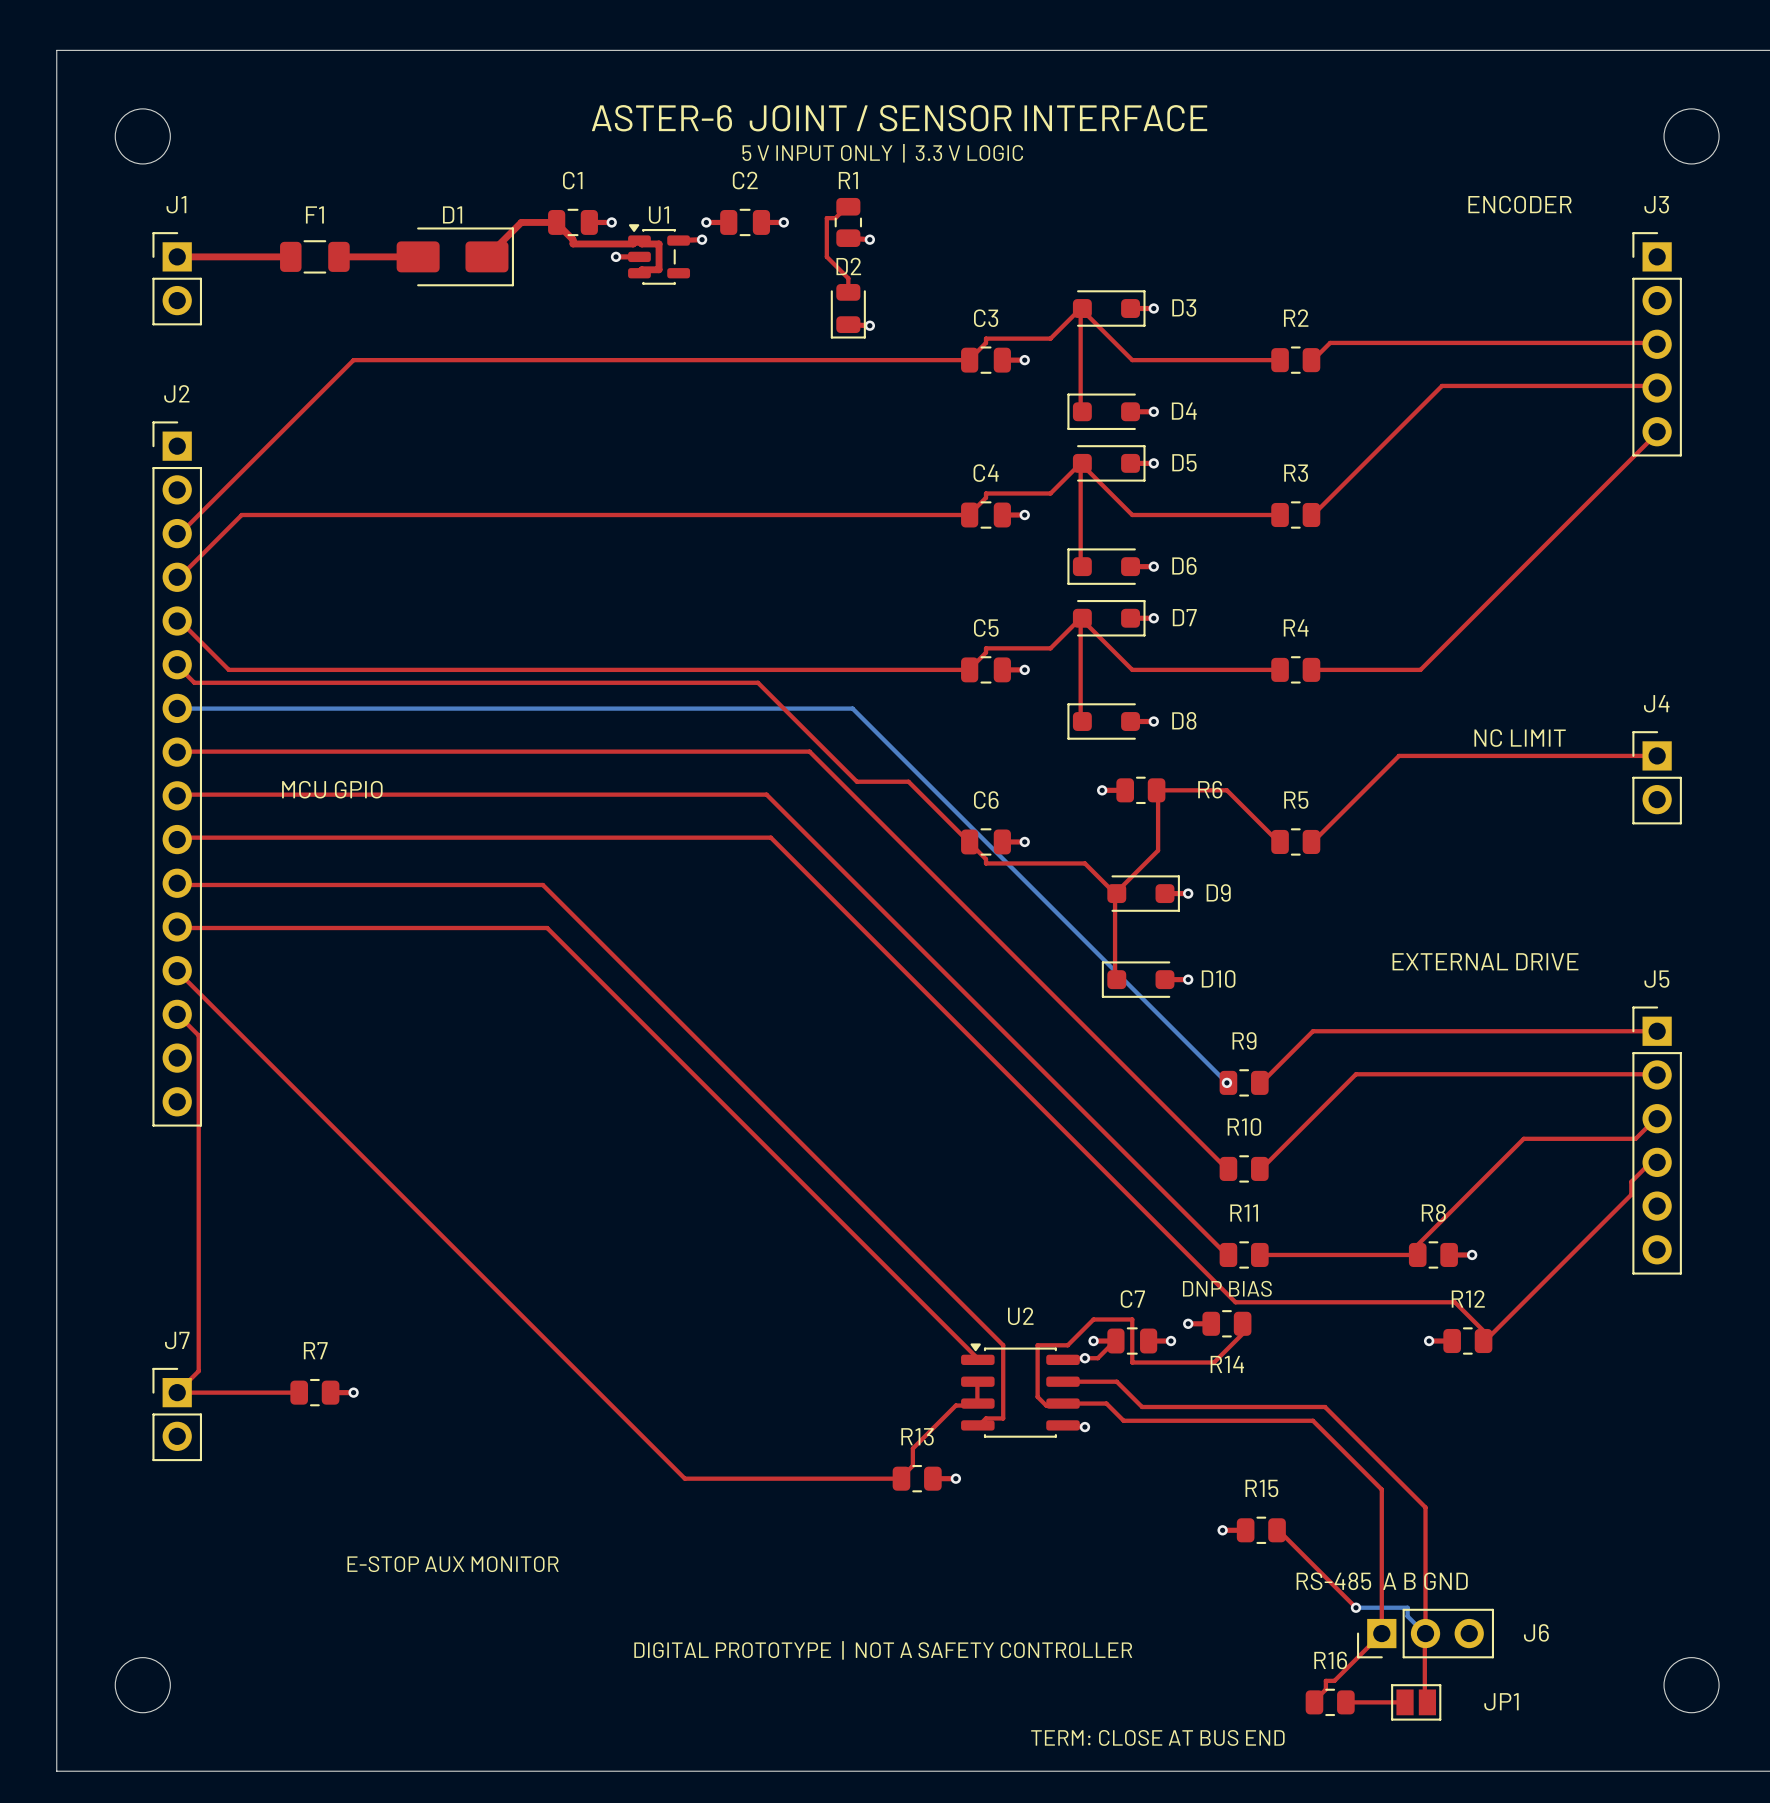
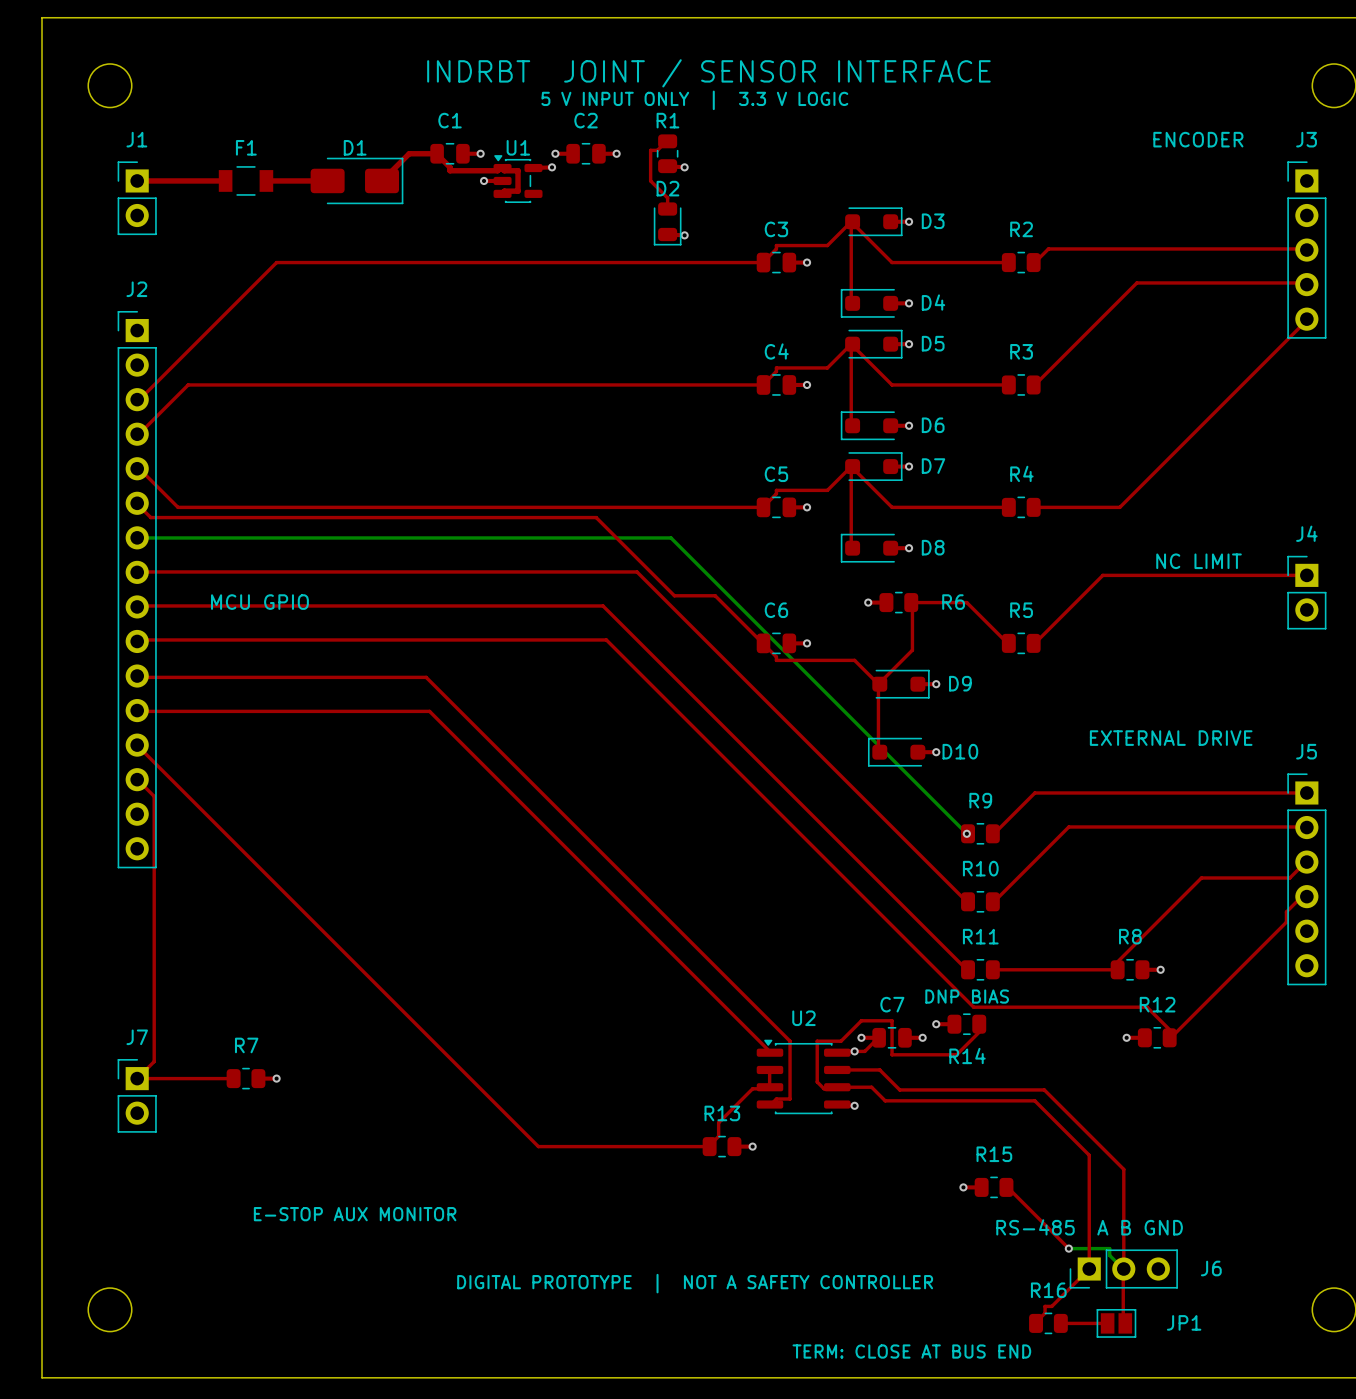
text: ASTER-6 JOINT / SENSOR INTERFACE (899, 118) -> INDRBT JOINT / SENSOR INTERFACE (708, 73)
F1 footprint: [280, 240, 350, 274] -> [218, 166, 274, 196]

